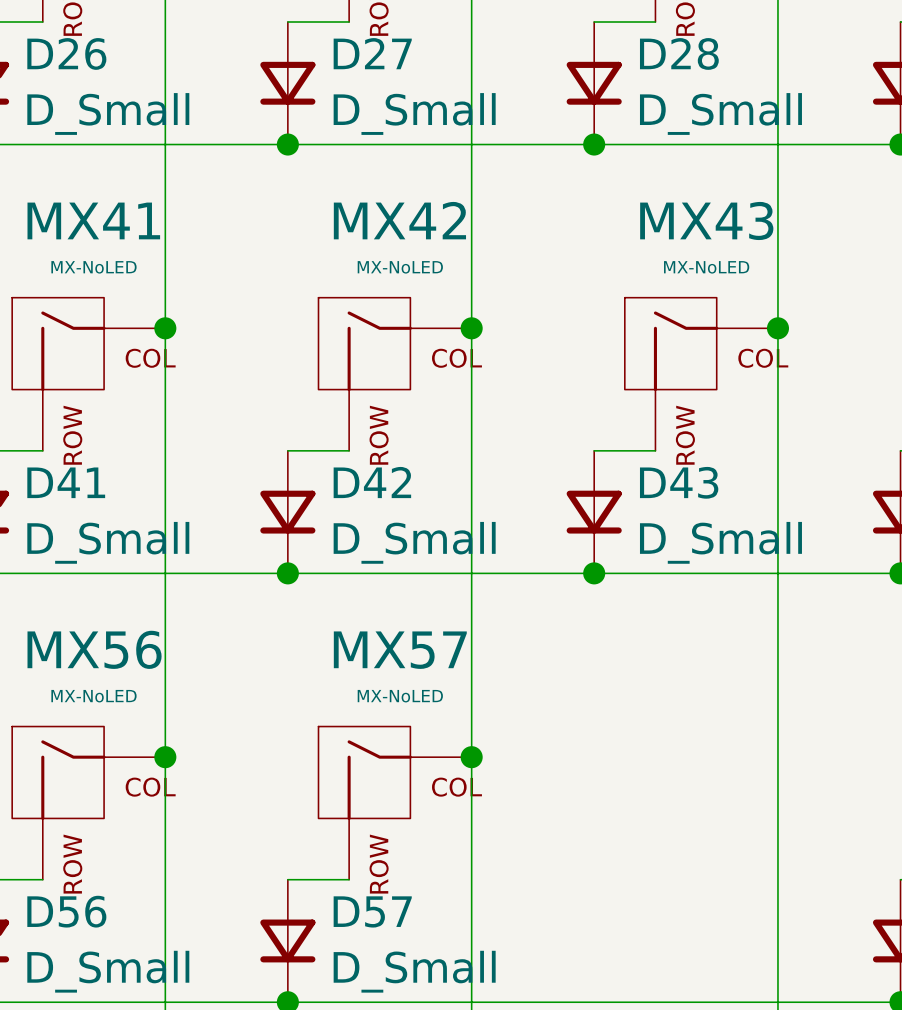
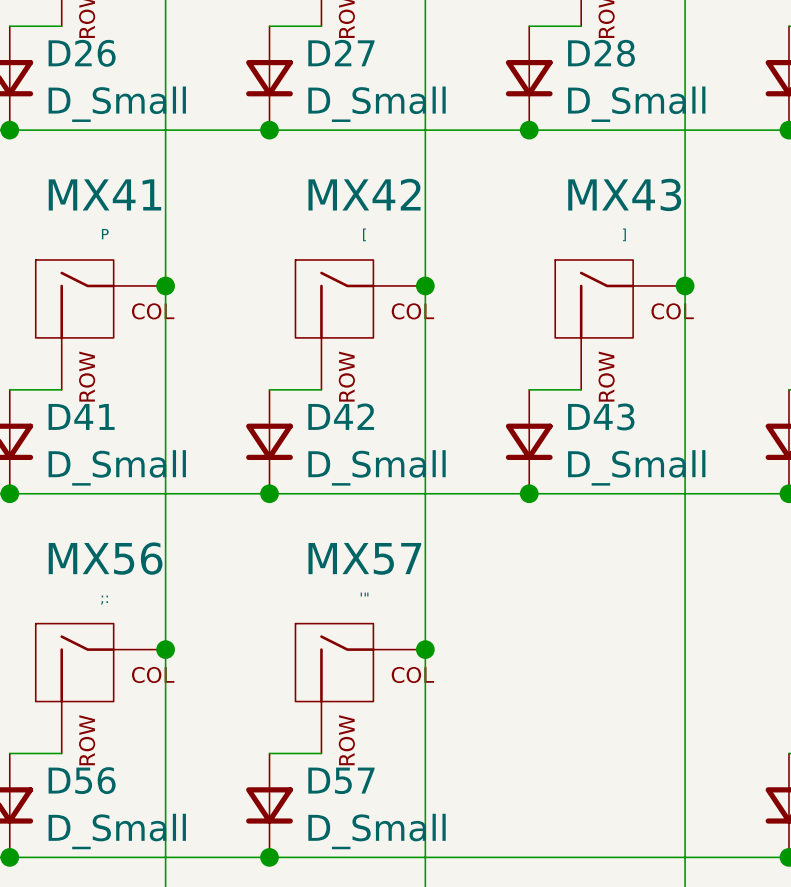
MX41 value: MX-NoLED (93, 267) -> P (105, 234)
MX42 value: MX-NoLED (400, 267) -> [ (364, 234)
MX43 value: MX-NoLED (706, 267) -> ] (624, 234)
MX56 value: MX-NoLED (93, 696) -> ;: (104, 600)
MX57 value: MX-NoLED (400, 696) -> '" (364, 594)

